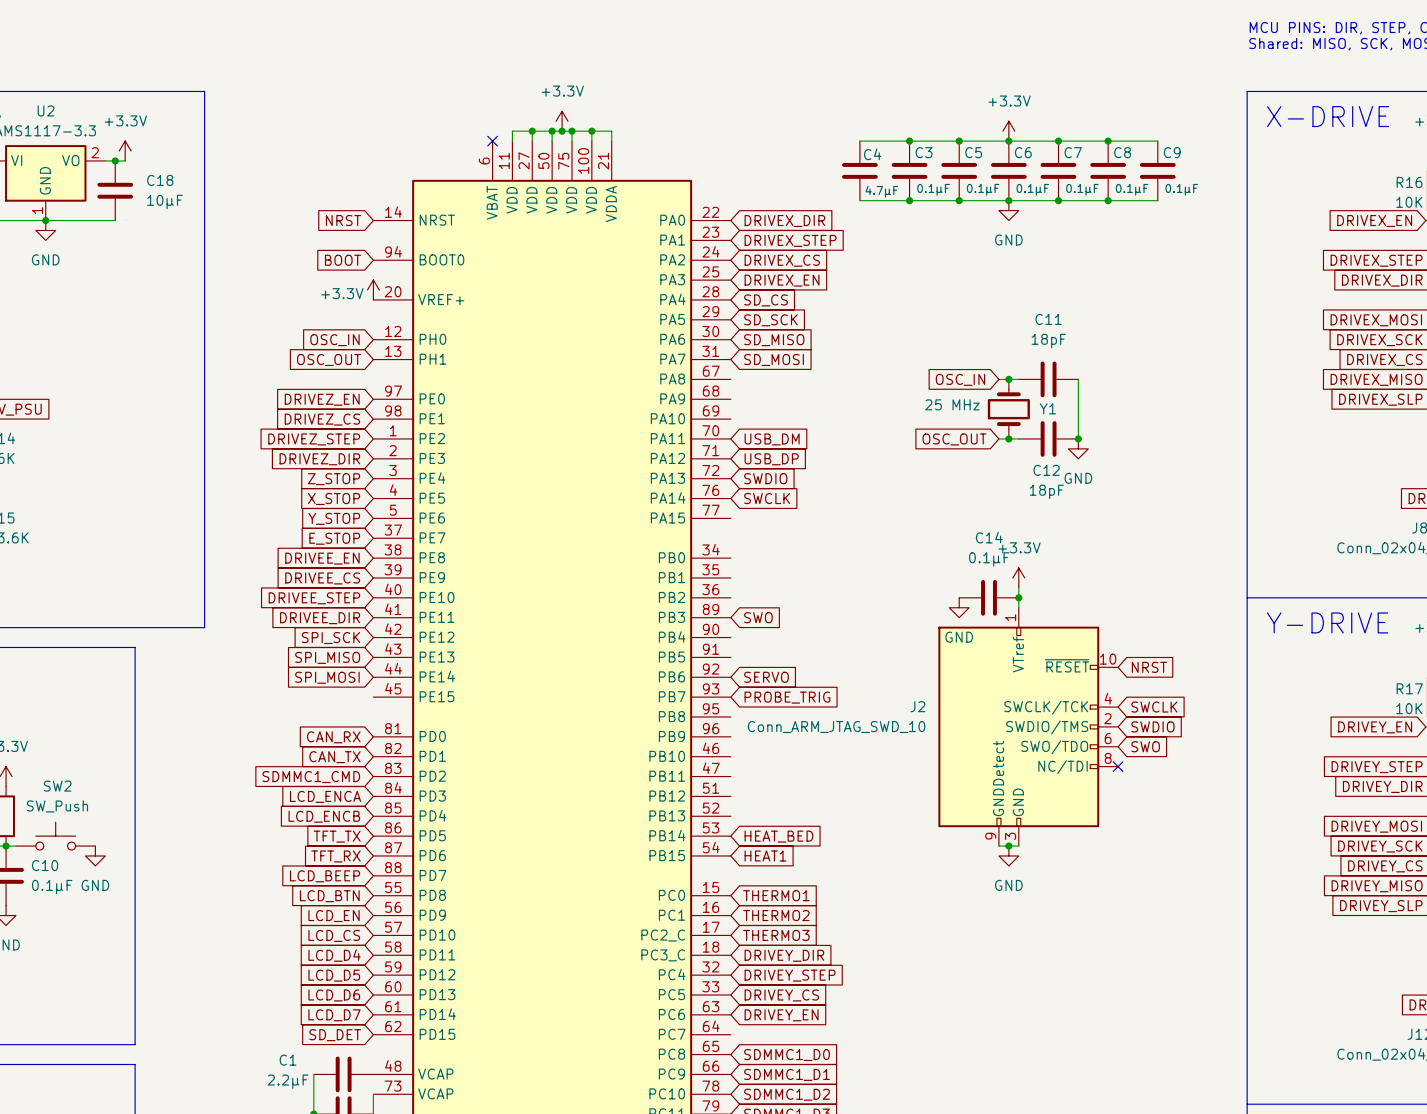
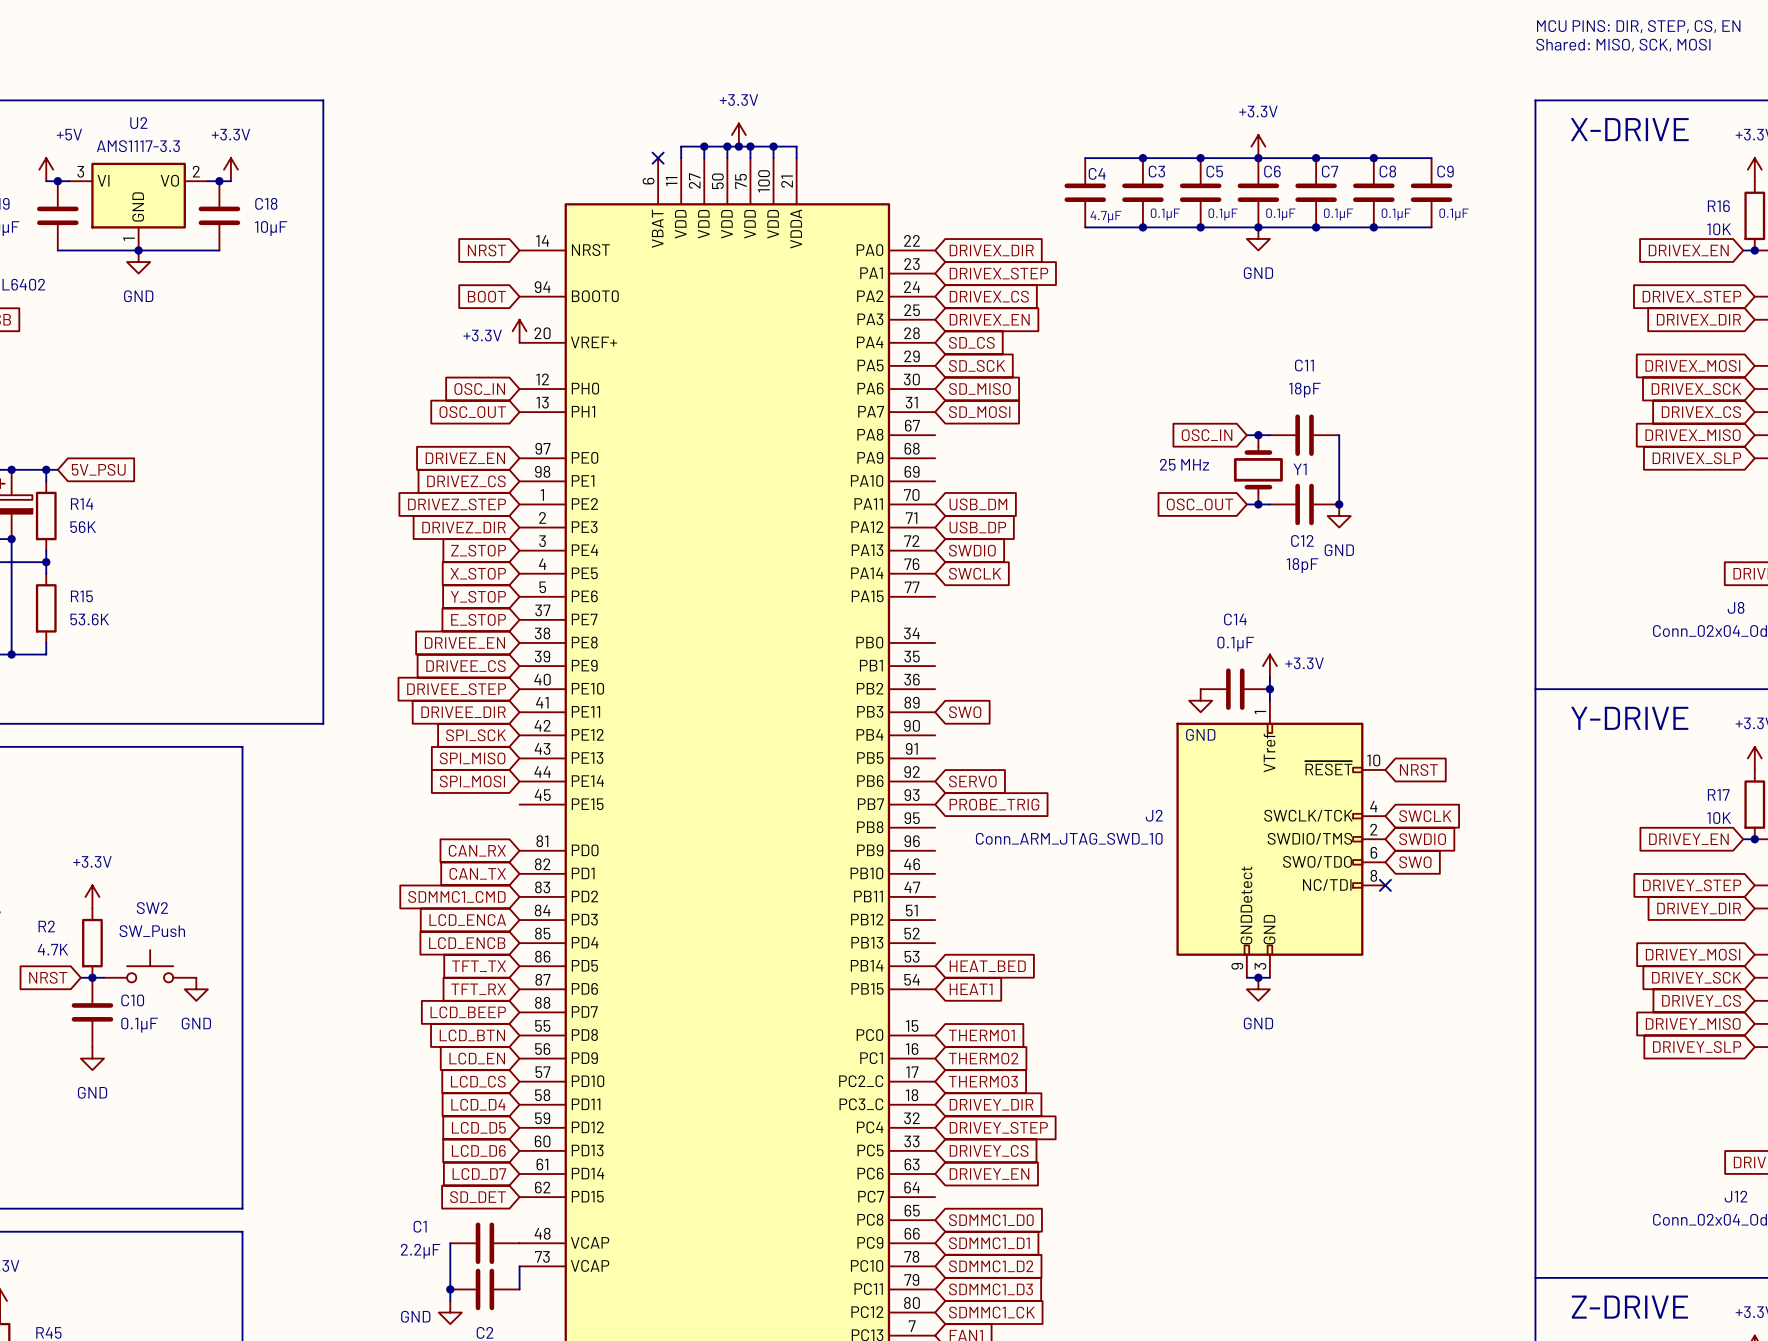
power symbol text position: +3.3V (1019, 547) -> +3.3V (1304, 663)

